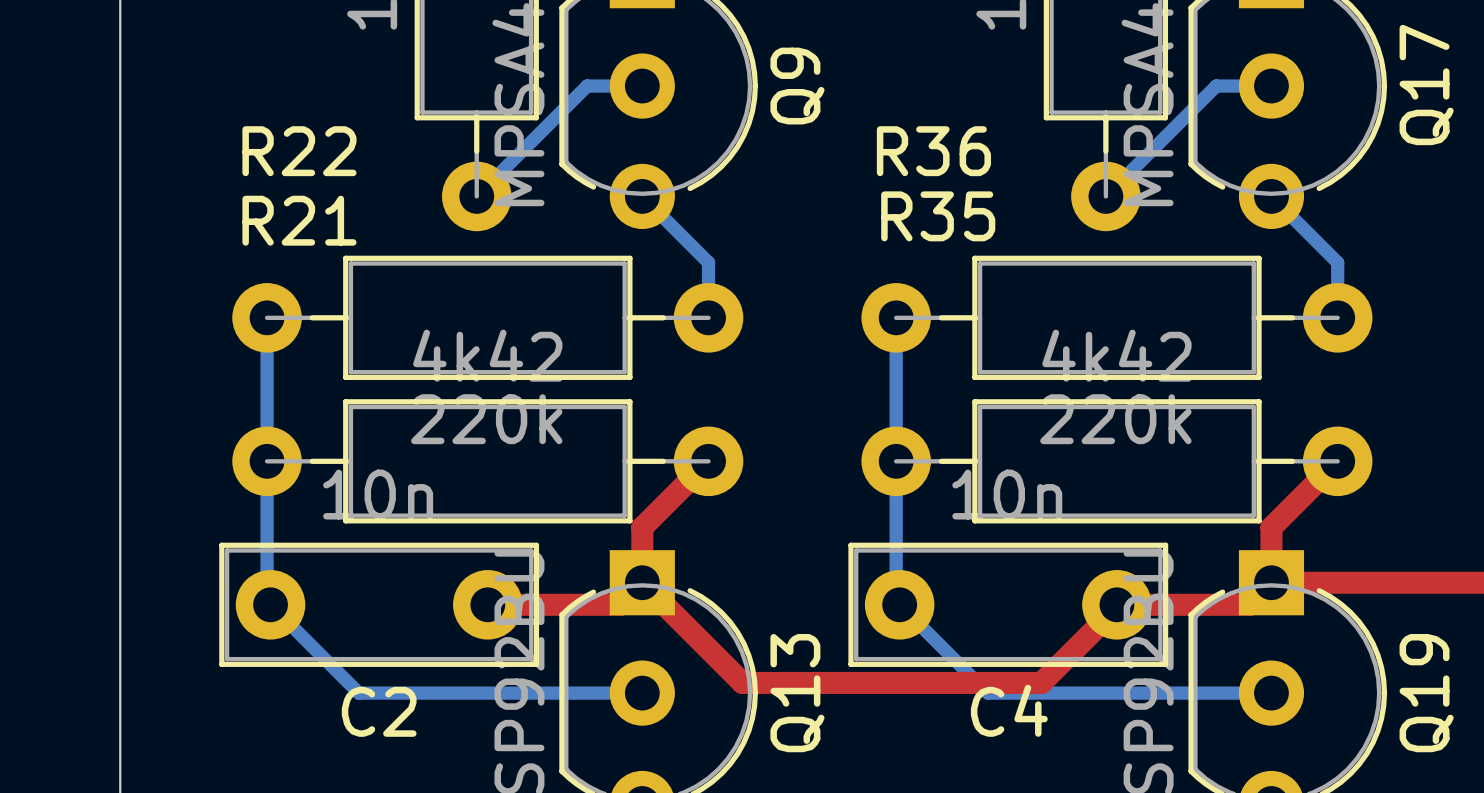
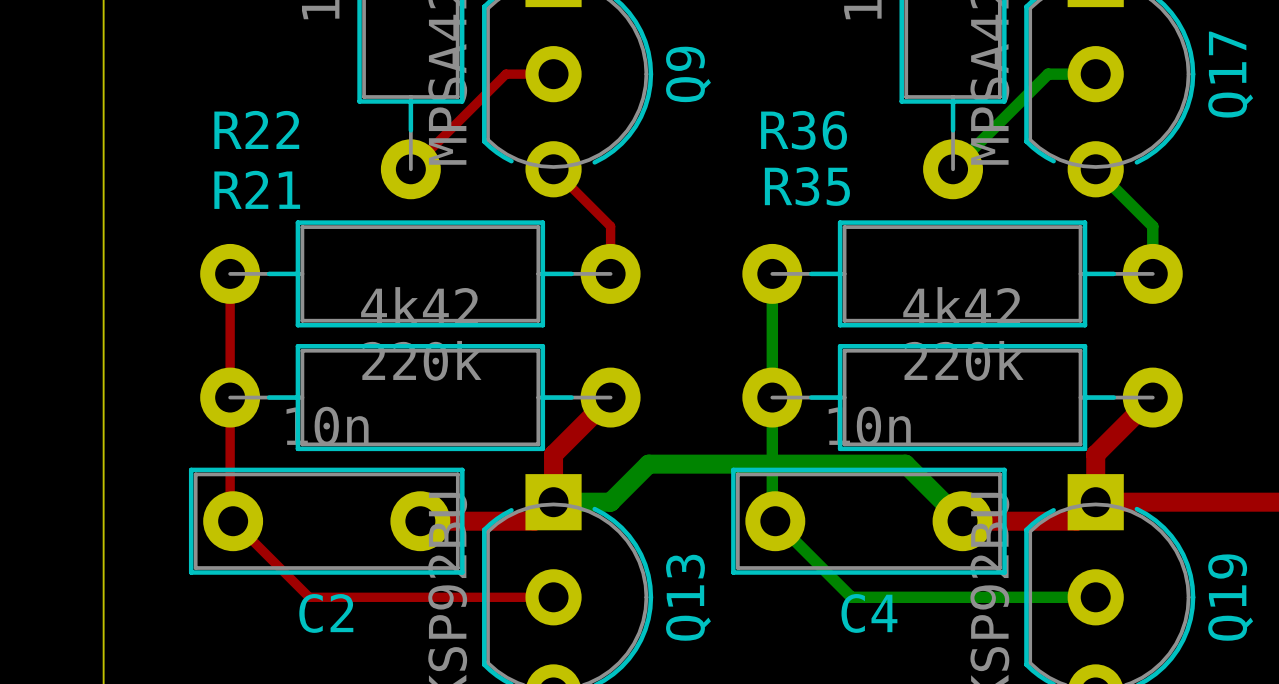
top track: none -> (553, 74) (505, 74) (410, 169)
bottom track: (642, 86) (587, 86) (476, 196) -> none
top track: none -> (553, 169) (610, 226) (610, 273)
bottom track: (642, 196) (708, 262) (708, 317) -> none
top track: none -> (230, 273) (230, 518) (309, 597) (553, 597)
bottom track: (267, 317) (267, 601) (358, 693) (642, 693) -> none
top track: (642, 582) (742, 682) (1041, 682) (1116, 607) (1116, 604) -> none
bottom track: none -> (553, 502) (610, 502) (648, 464) (905, 464) (962, 521)

